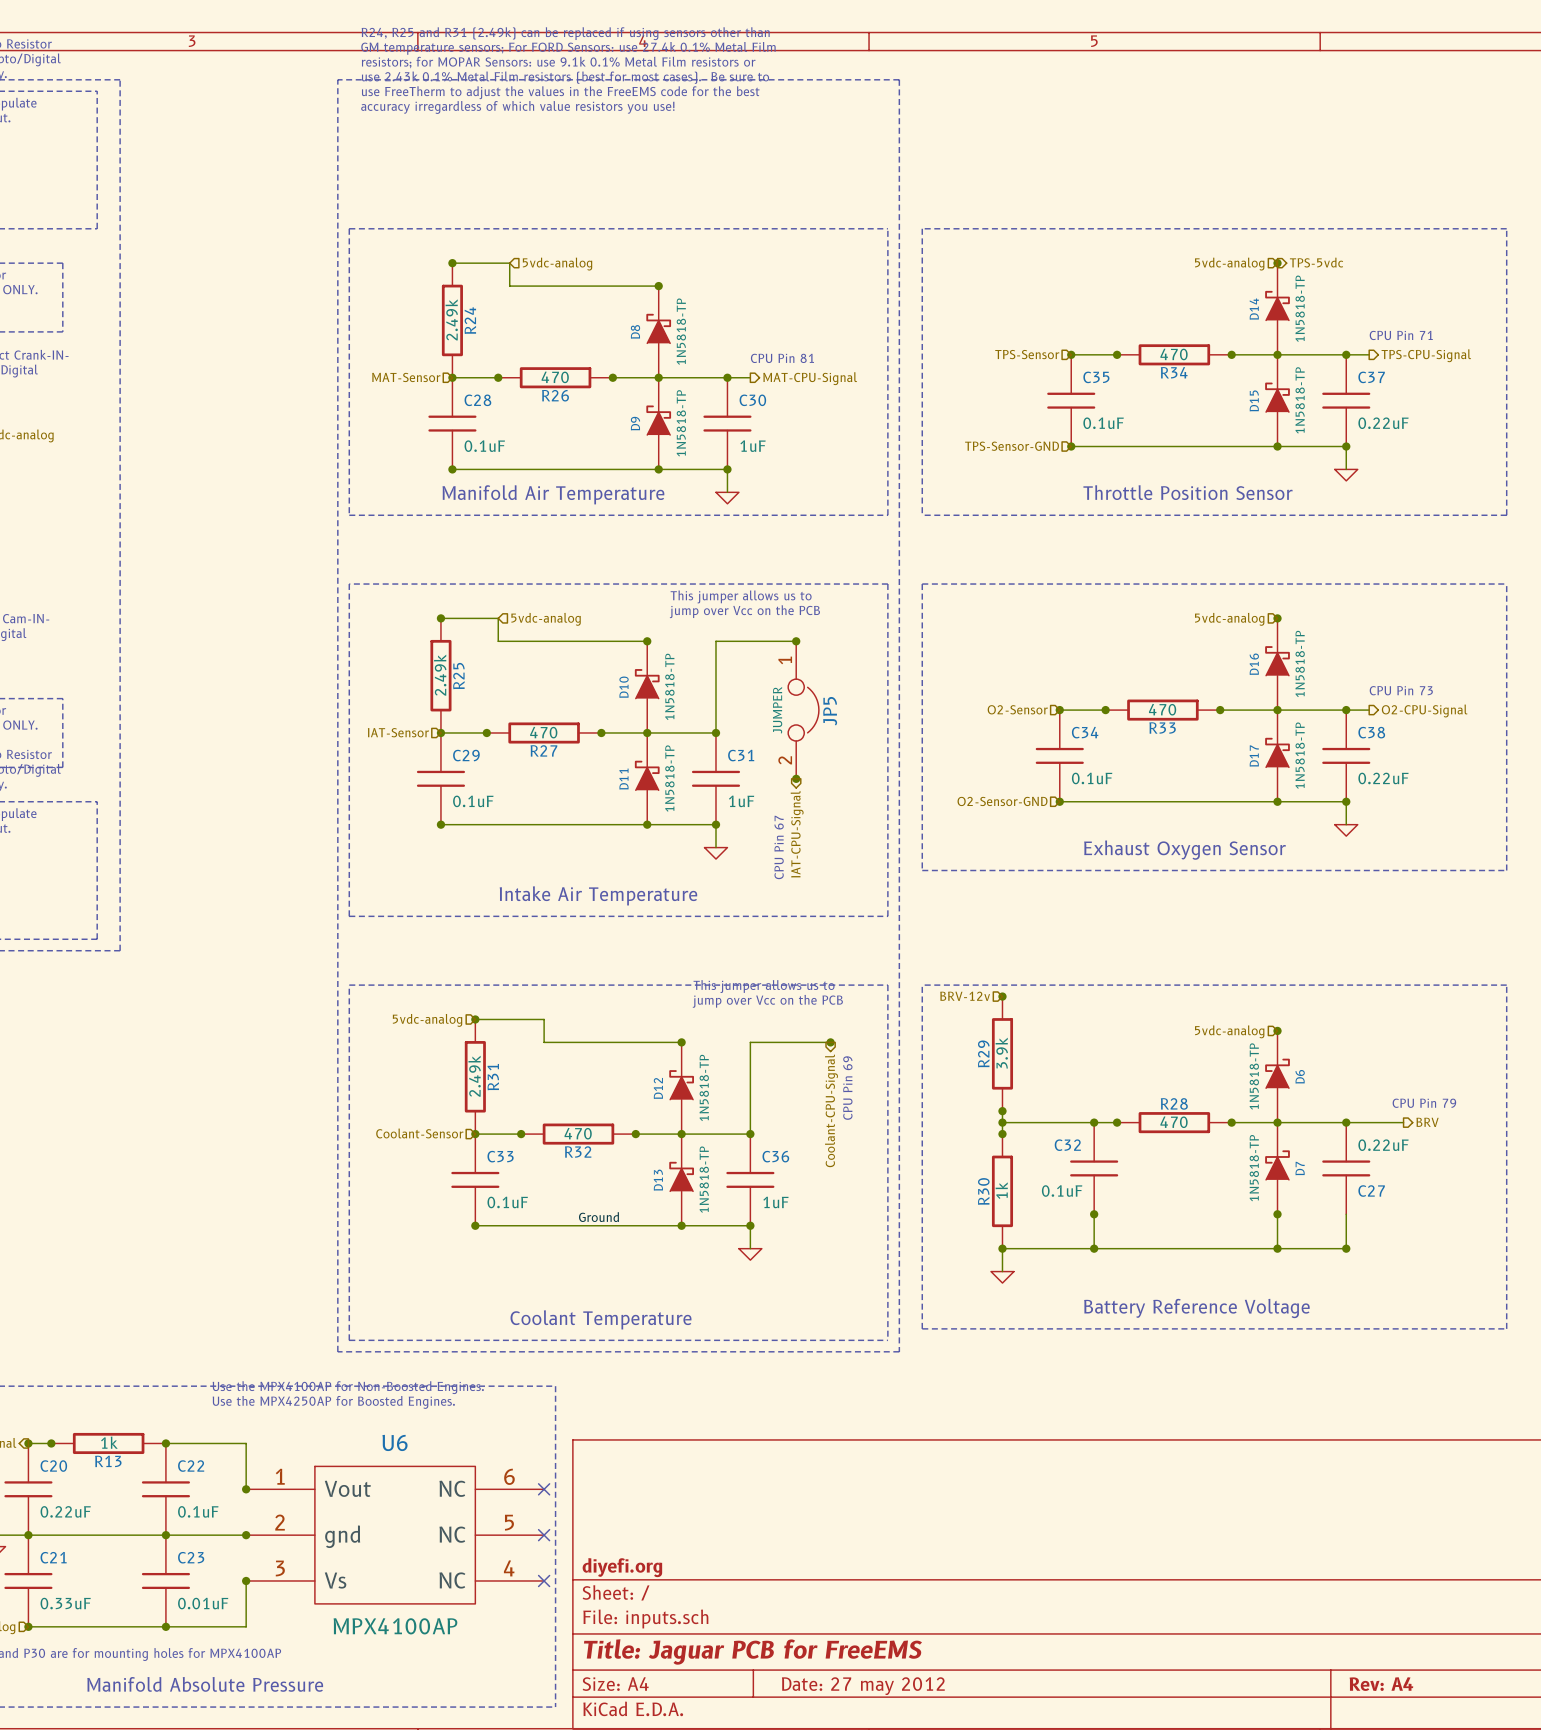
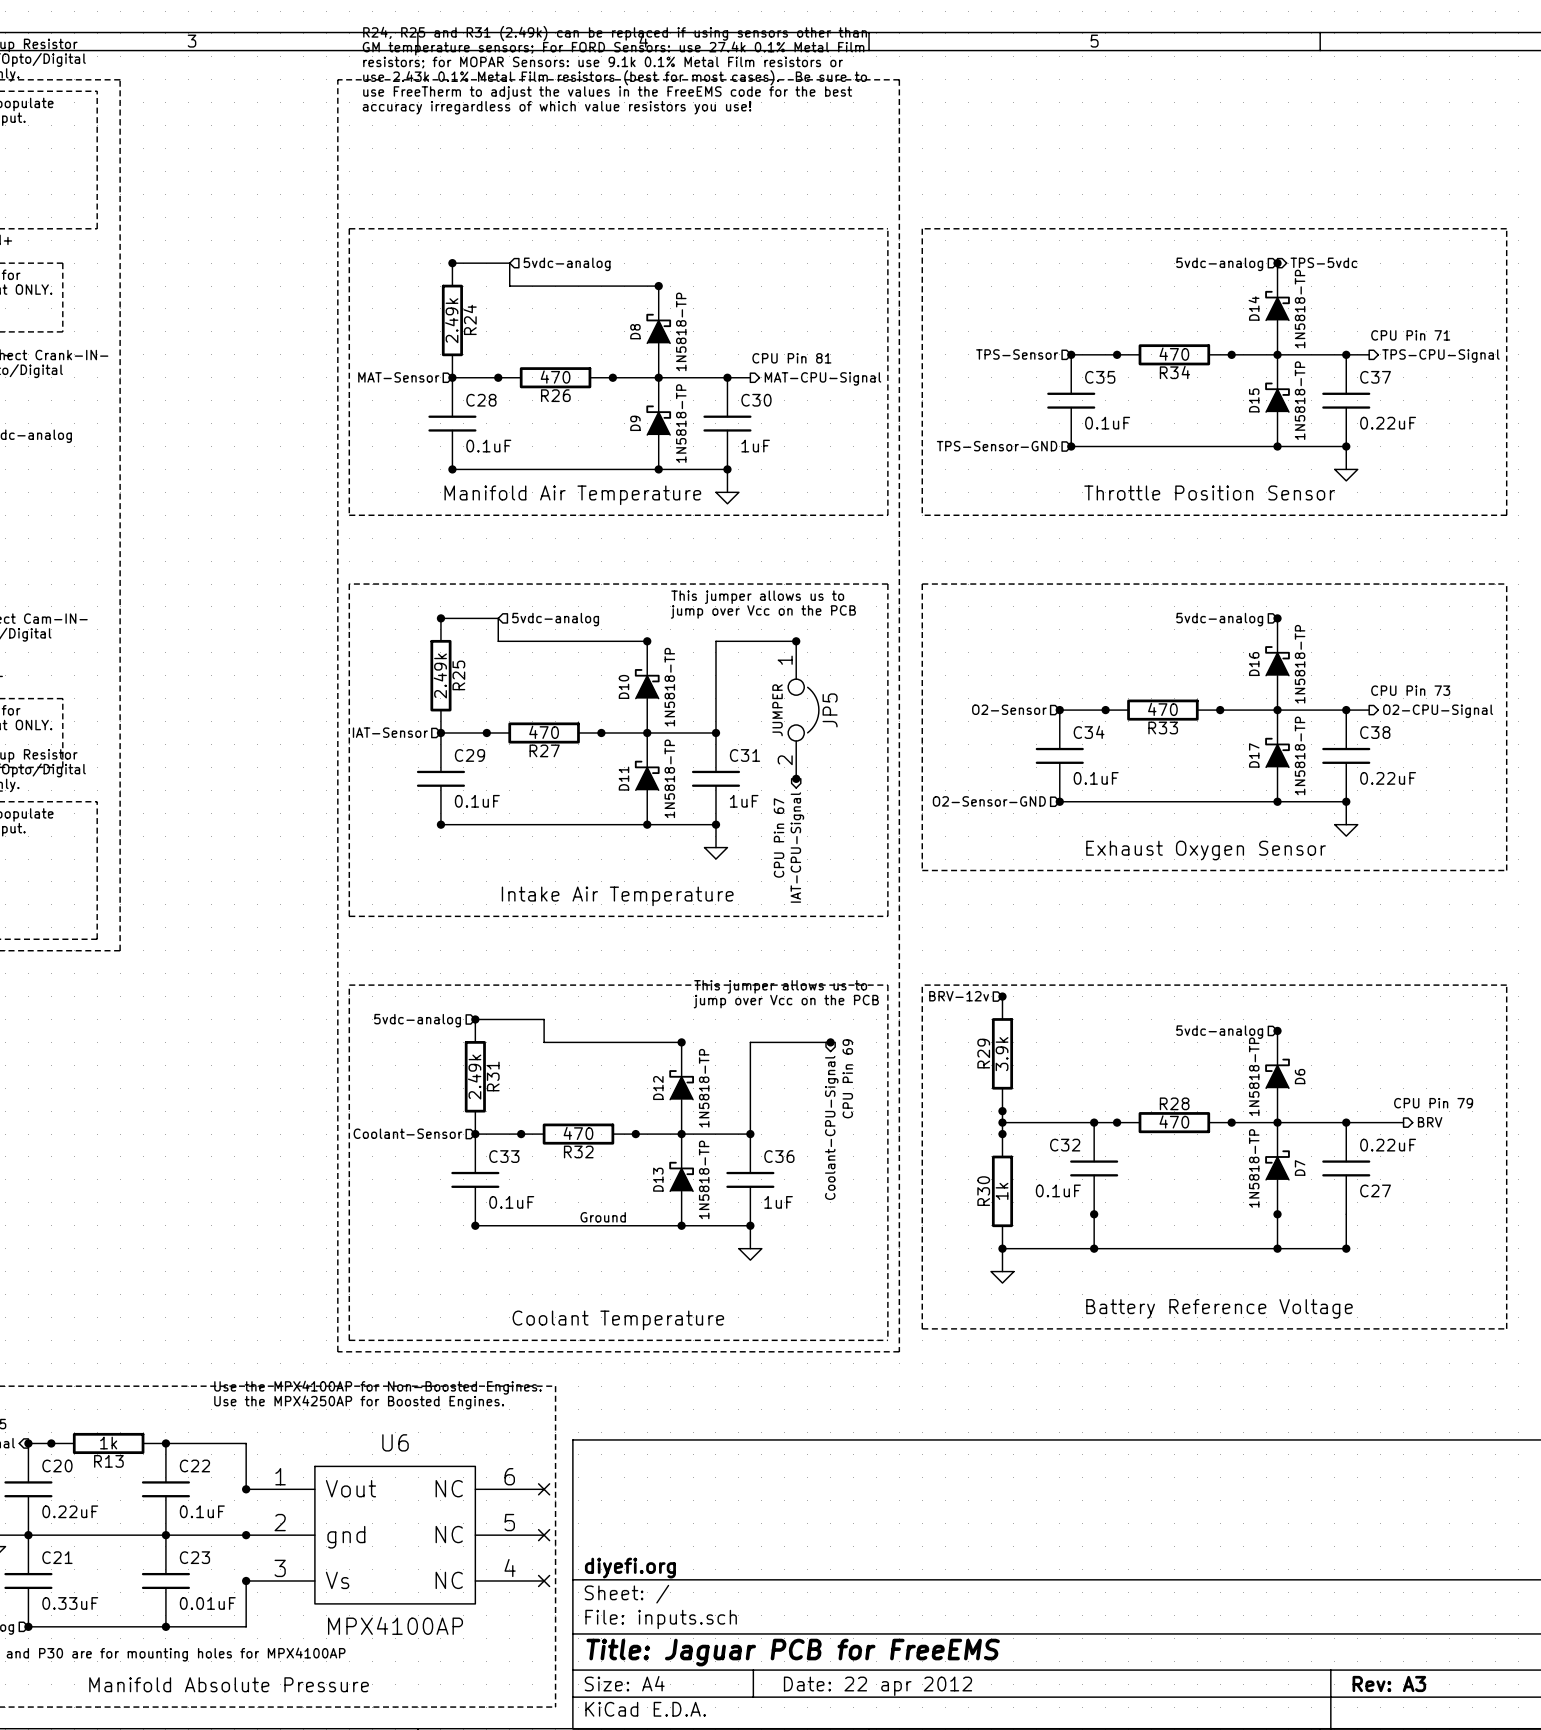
title block: Rev: A4 (1381, 1684) -> Rev: A3 (1389, 1684)
title block: Date: 27 may 2012 (863, 1686) -> Date: 22 apr 2012 (878, 1686)

